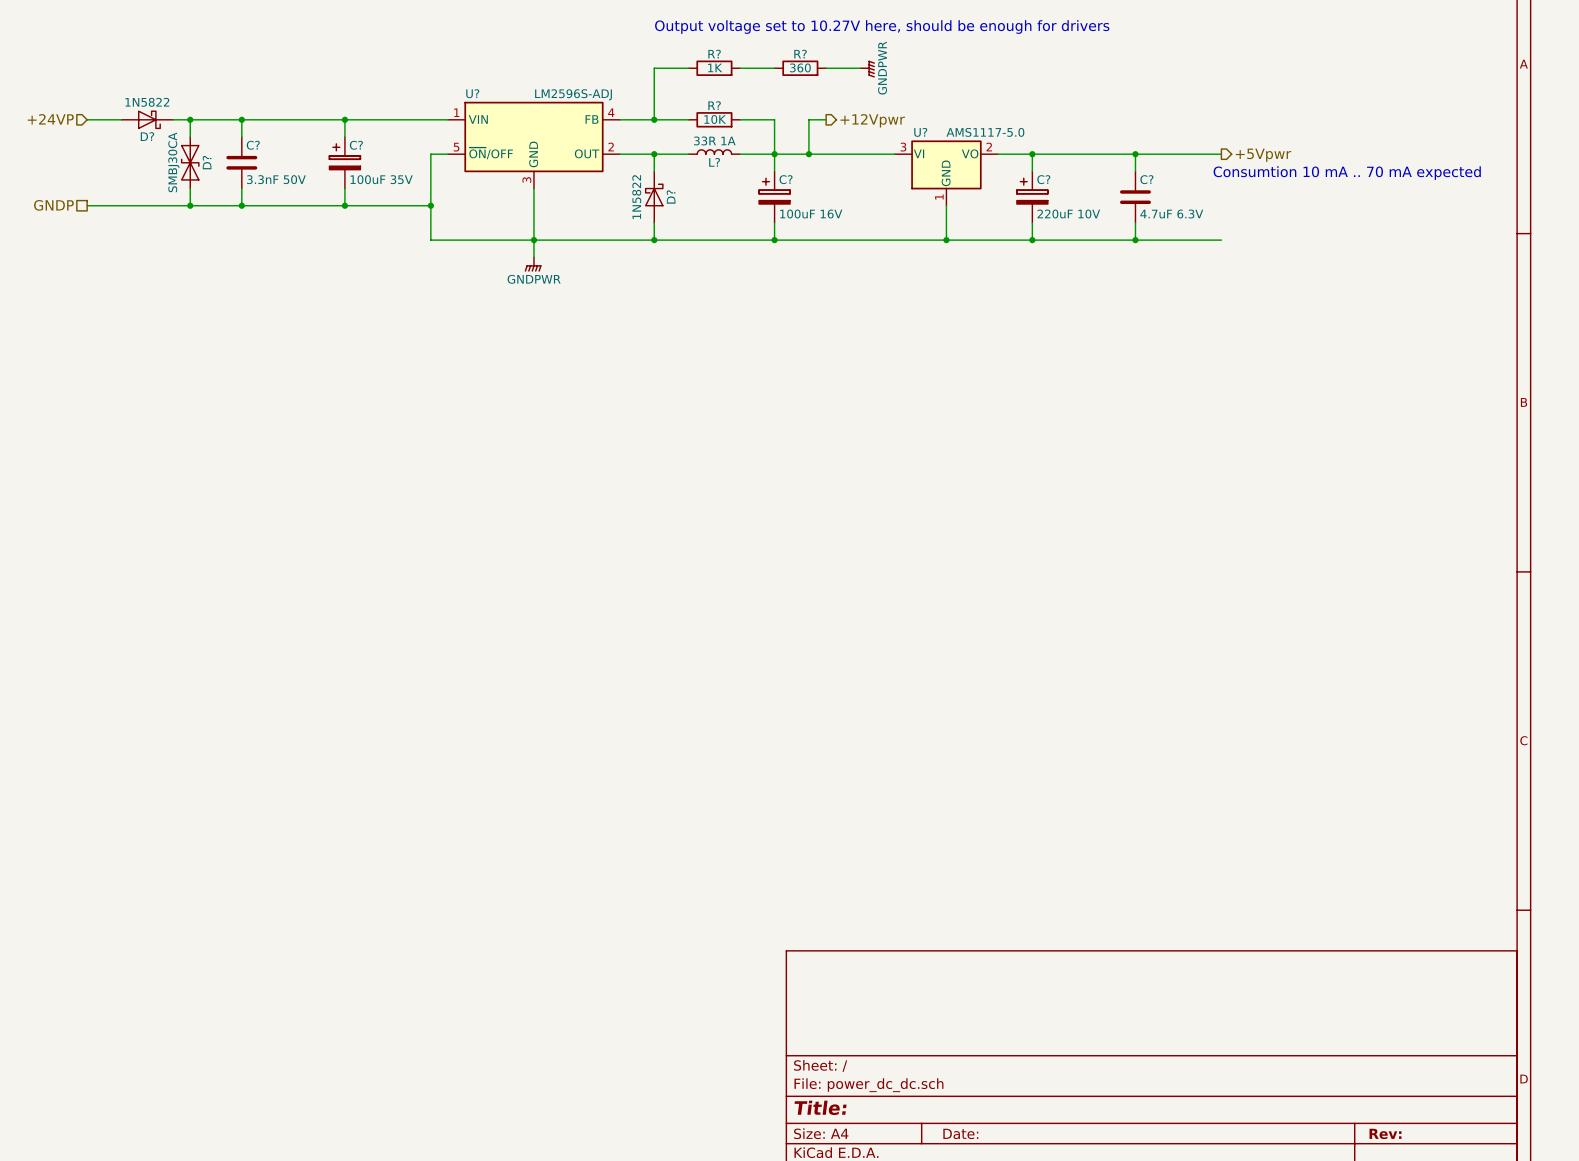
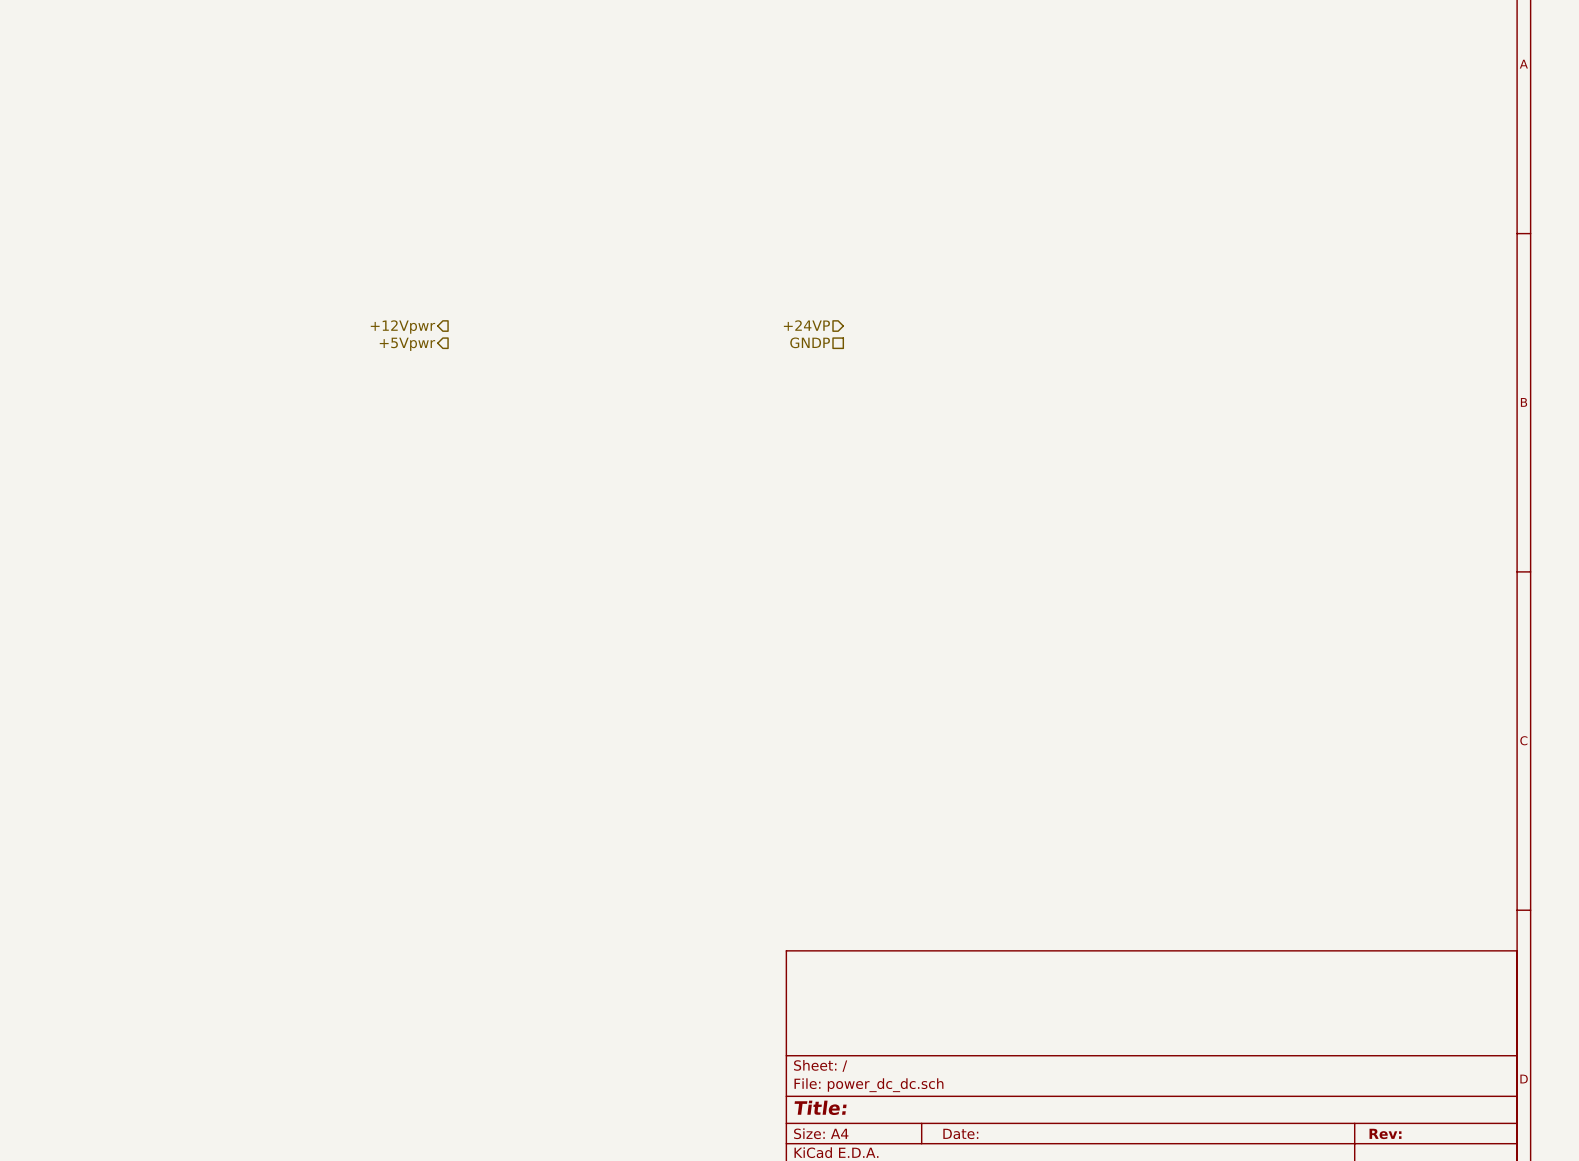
text: Output voltage set to 10.27V here, should be enough for drivers (882, 27) -> none
wire: (688, 68) (654, 68) (654, 119) -> none
R?: 1K (714, 68) -> none
wire: (740, 68) (774, 68) -> none
R?: 360 (800, 68) -> none
wire: (826, 68) (860, 68) -> none
power symbol: GNDPWR (867, 69) -> none
hierarchical label: +24VP (50, 119) -> none
wire: (87, 119) (121, 119) -> none
D?: 1N5822 (147, 119) -> none
wire: (173, 119) (448, 119) -> none
wire: (190, 119) (190, 136) -> none
junction: (190, 119) -> none
wire: (241, 119) (241, 136) -> none
junction: (241, 119) -> none
wire: (344, 119) (344, 136) -> none
junction: (344, 119) -> none
wire: (619, 119) (688, 119) -> none
junction: (654, 119) -> none
R?: 10K (714, 119) -> none
wire: (740, 119) (774, 119) (774, 171) -> none
wire: (826, 119) (808, 119) (808, 154) -> none
hierarchical label: +12Vpwr (872, 120) -> none
U?: LM2596S-ADJ (533, 145) -> none
L?: 33R 1A (714, 152) -> none
wire: (448, 154) (430, 154) (430, 240) (1221, 240) -> none
wire: (619, 154) (688, 154) -> none
wire: (654, 154) (654, 171) -> none
junction: (654, 154) -> none
wire: (740, 154) (894, 154) -> none
junction: (774, 154) -> none
junction: (808, 154) -> none
wire: (997, 154) (1221, 154) -> none
wire: (1032, 154) (1032, 171) -> none
junction: (1032, 154) -> none
wire: (1135, 154) (1135, 171) -> none
junction: (1135, 154) -> none
hierarchical label: +5Vpwr (1263, 155) -> none
D?: SMBJ30CA (190, 162) -> none
C?: 3.3nF 50V (241, 162) -> none
C?: 100uF 35V (344, 162) -> none
U?: AMS1117-5.0 (946, 173) -> none
text: Consumtion 10 mA .. 70 mA expected (1347, 173) -> none
wire: (190, 188) (190, 205) -> none
wire: (241, 188) (241, 205) -> none
wire: (344, 188) (344, 205) -> none
wire: (533, 188) (533, 257) -> none
D?: 1N5822 (654, 197) -> none
C?: 100uF 16V (774, 197) -> none
C?: 220uF 10V (1032, 197) -> none
C?: 4.7uF 6.3V (1135, 197) -> none
hierarchical label: GNDP (53, 205) -> none
wire: (87, 205) (430, 205) -> none
junction: (190, 205) -> none
junction: (241, 205) -> none
junction: (344, 205) -> none
junction: (430, 205) -> none
wire: (946, 205) (946, 240) -> none
wire: (654, 222) (654, 240) -> none
wire: (774, 222) (774, 240) -> none
wire: (1032, 222) (1032, 240) -> none
wire: (1135, 222) (1135, 240) -> none
junction: (533, 240) -> none
junction: (654, 240) -> none
junction: (774, 240) -> none
junction: (946, 240) -> none
junction: (1032, 240) -> none
junction: (1135, 240) -> none
power symbol: GNDPWR (533, 264) -> none
hierarchical label: none -> +24VP (806, 325)
hierarchical label: none -> +12Vpwr (402, 327)
hierarchical label: none -> GNDP (810, 342)
hierarchical label: none -> +5Vpwr (407, 344)

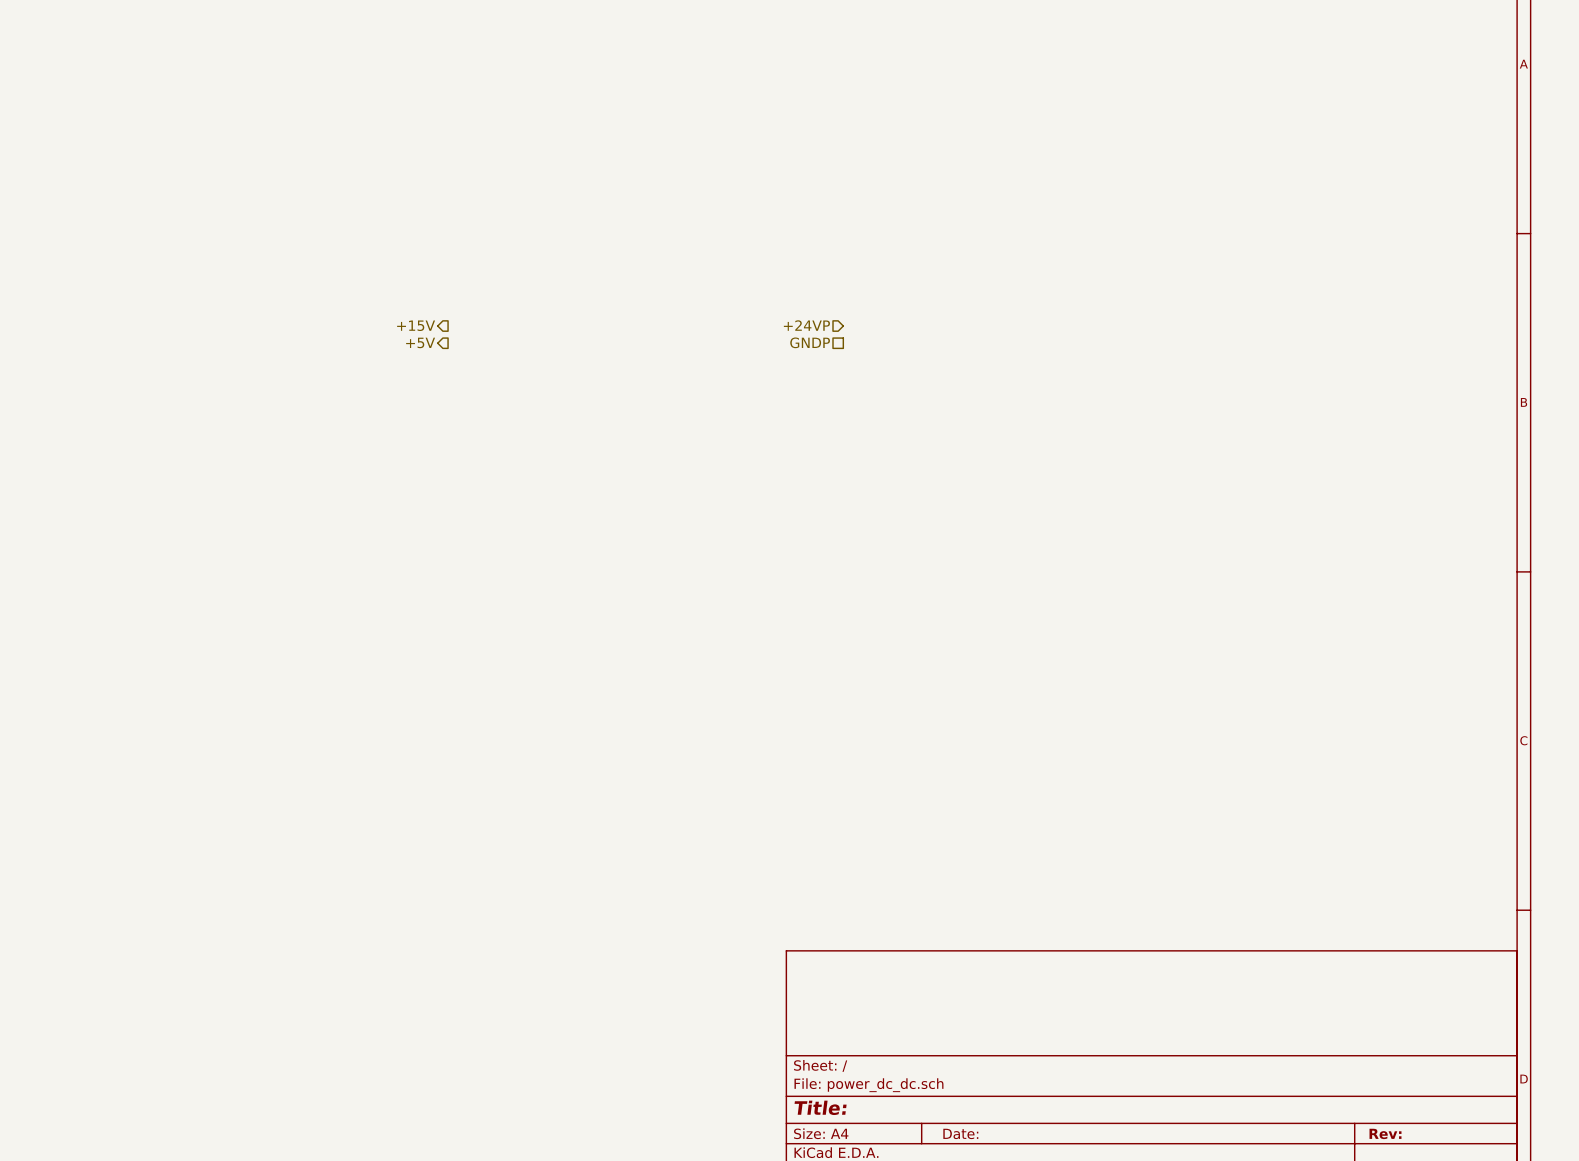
hierarchical label: +12Vpwr (402, 327) -> +15V (416, 325)
hierarchical label: +5Vpwr (407, 344) -> +5V (420, 342)

